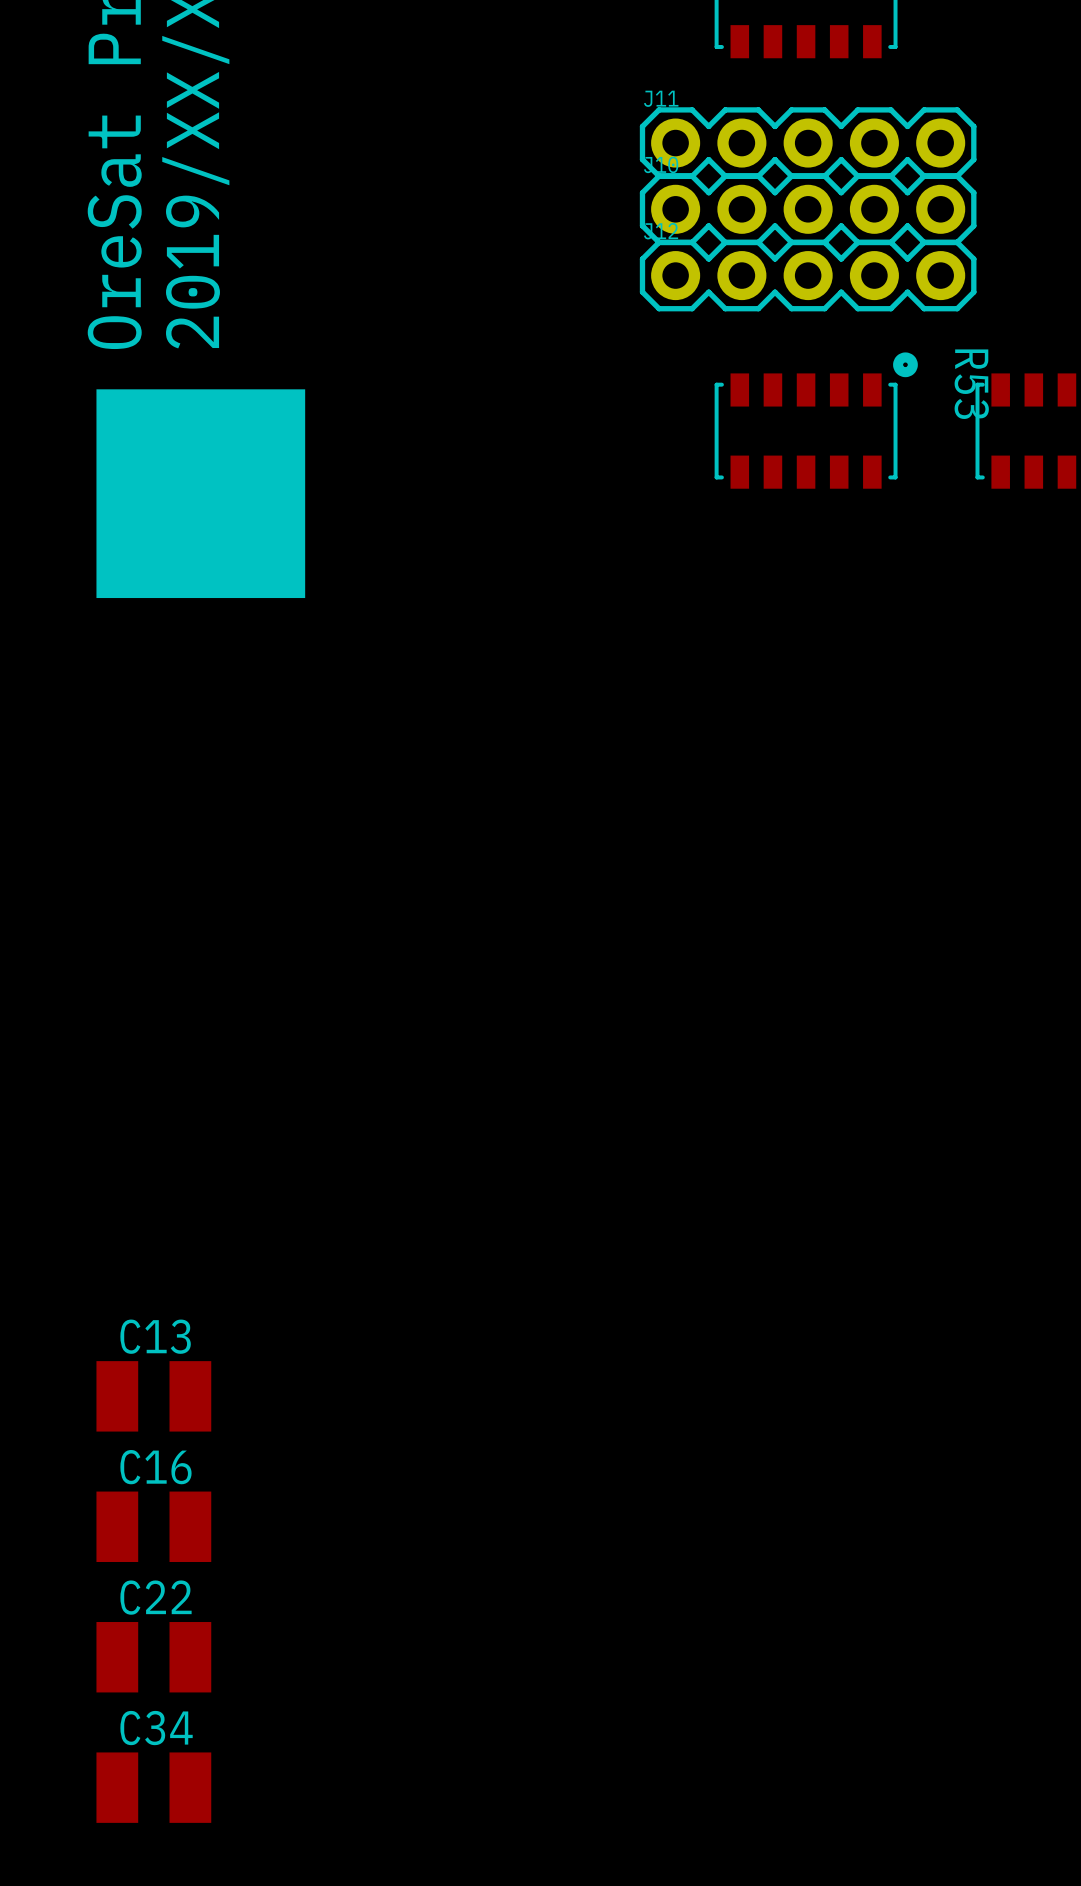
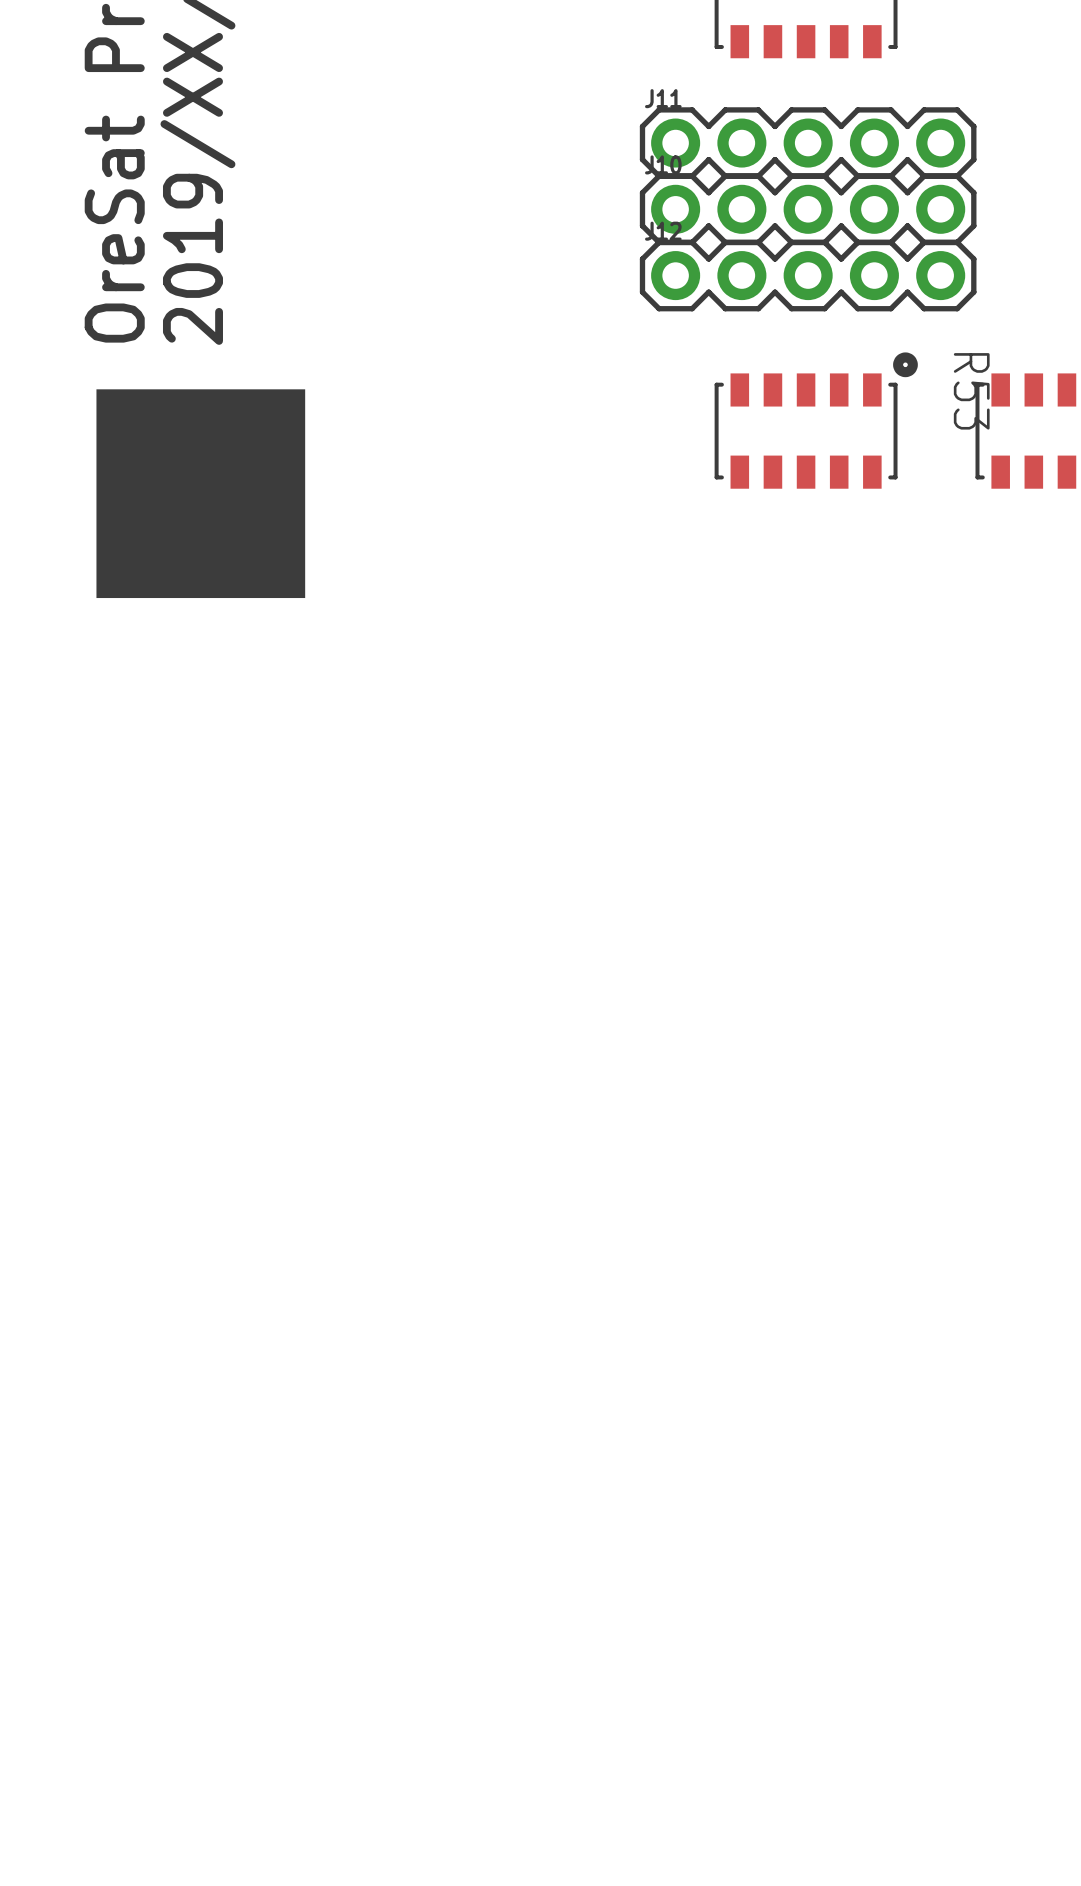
C13: (153, 1396) -> none
C16: (153, 1526) -> none
C22: (153, 1657) -> none
C34: (153, 1787) -> none

